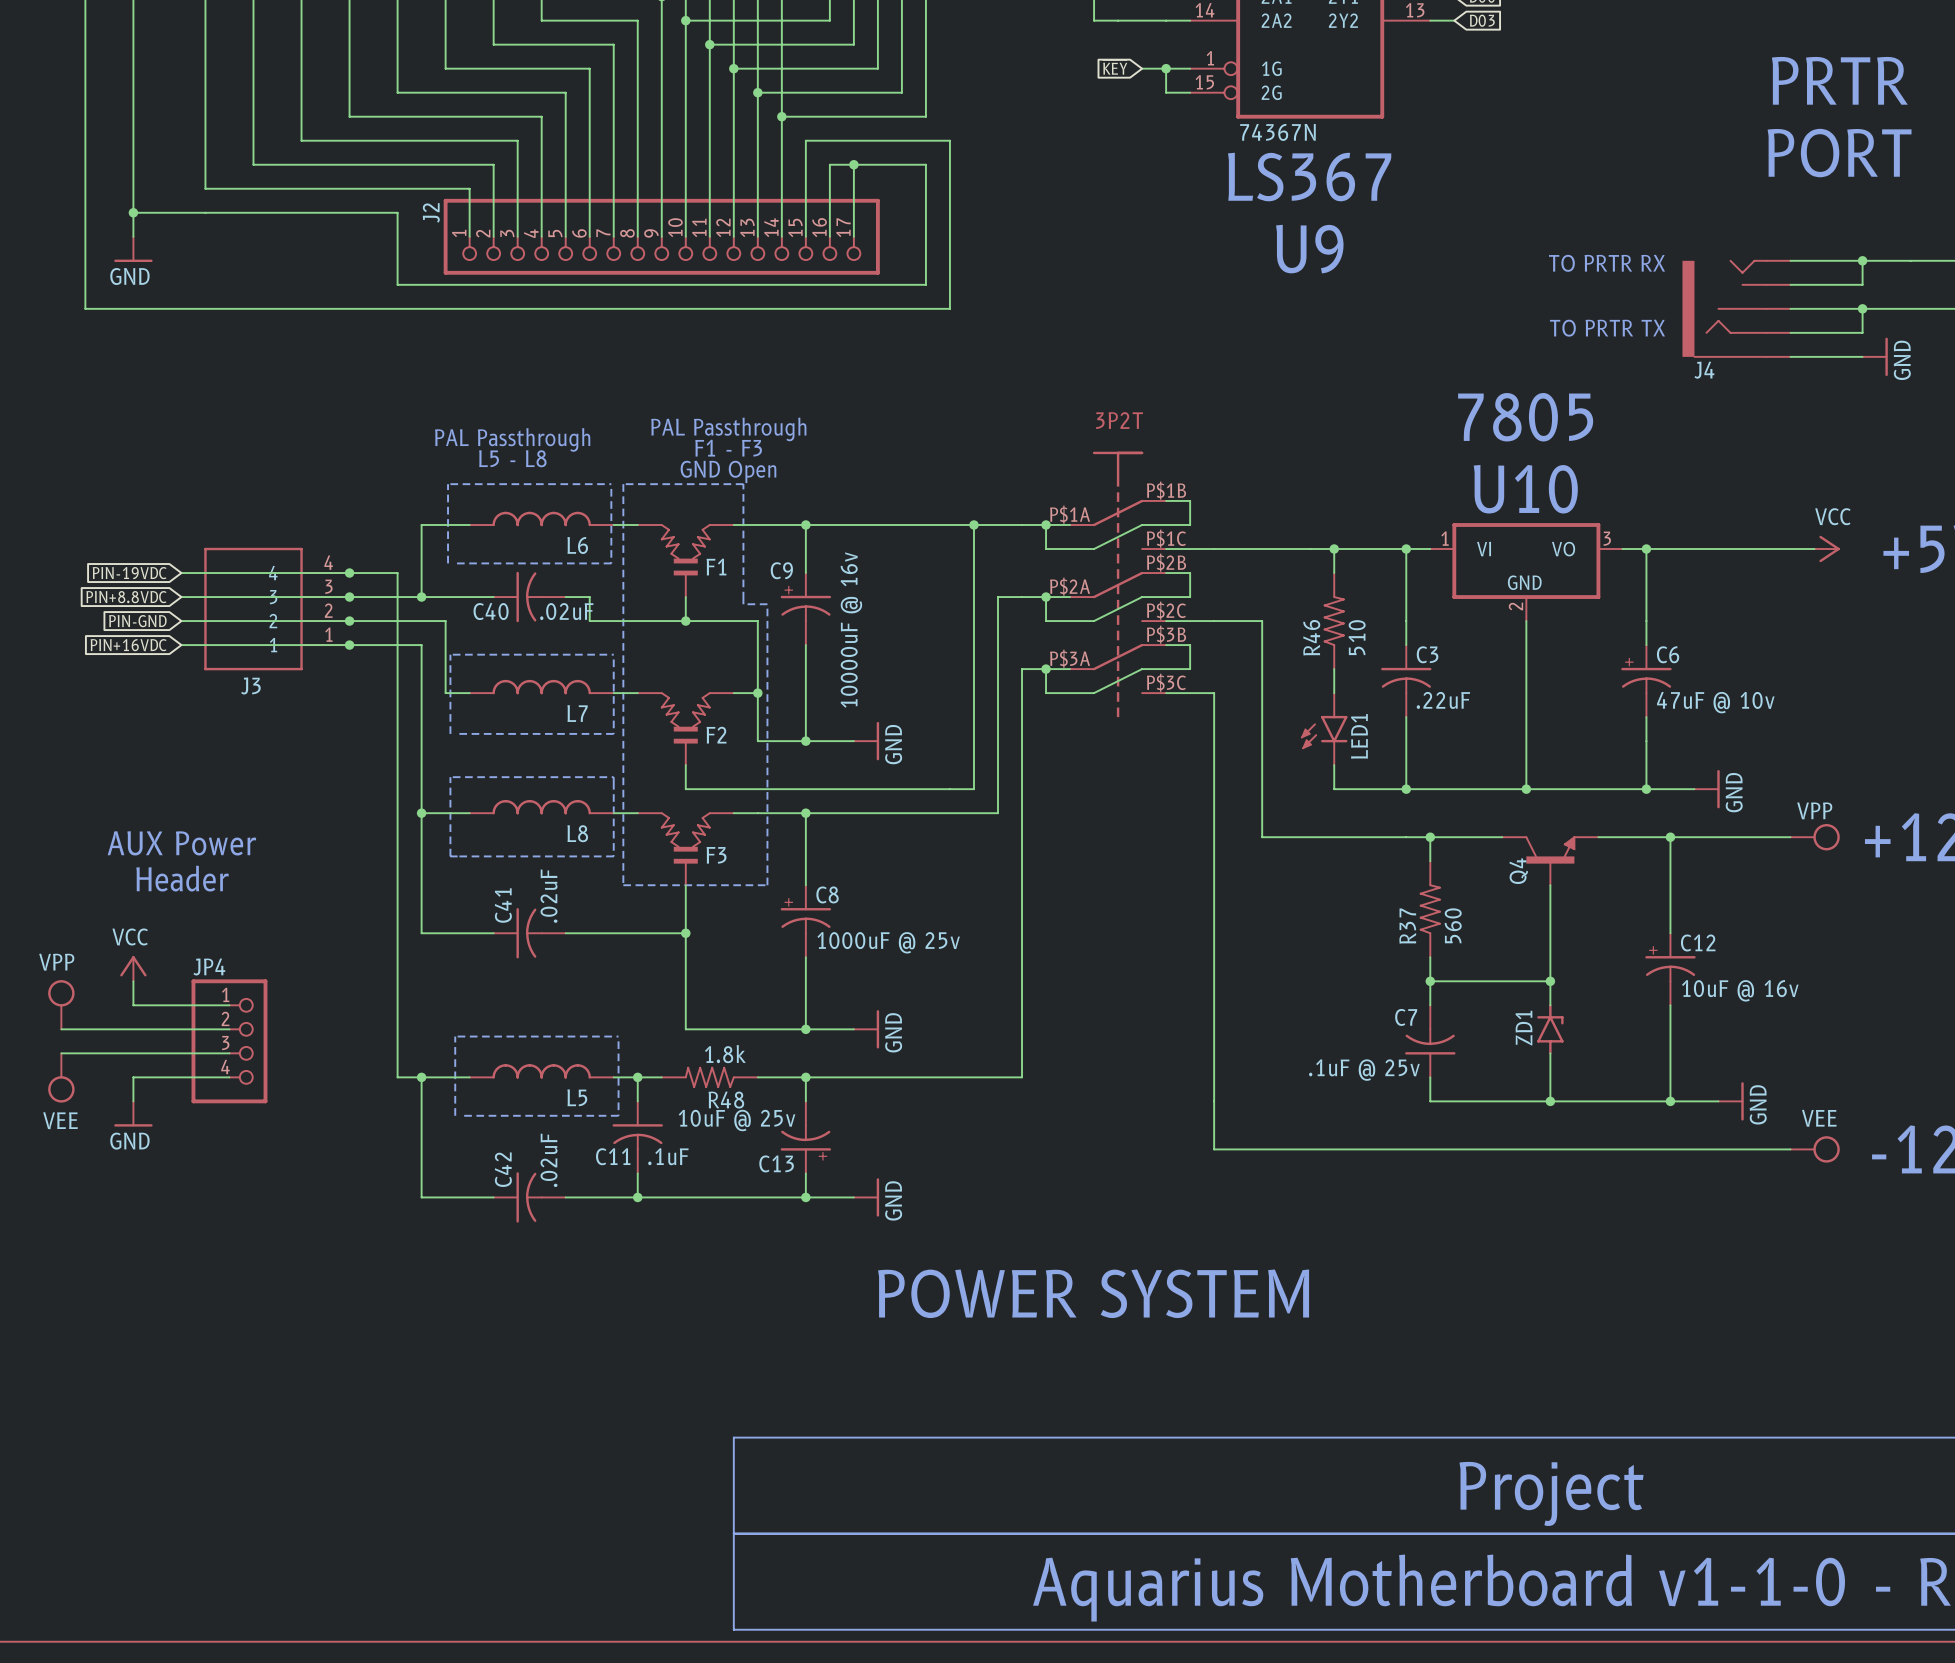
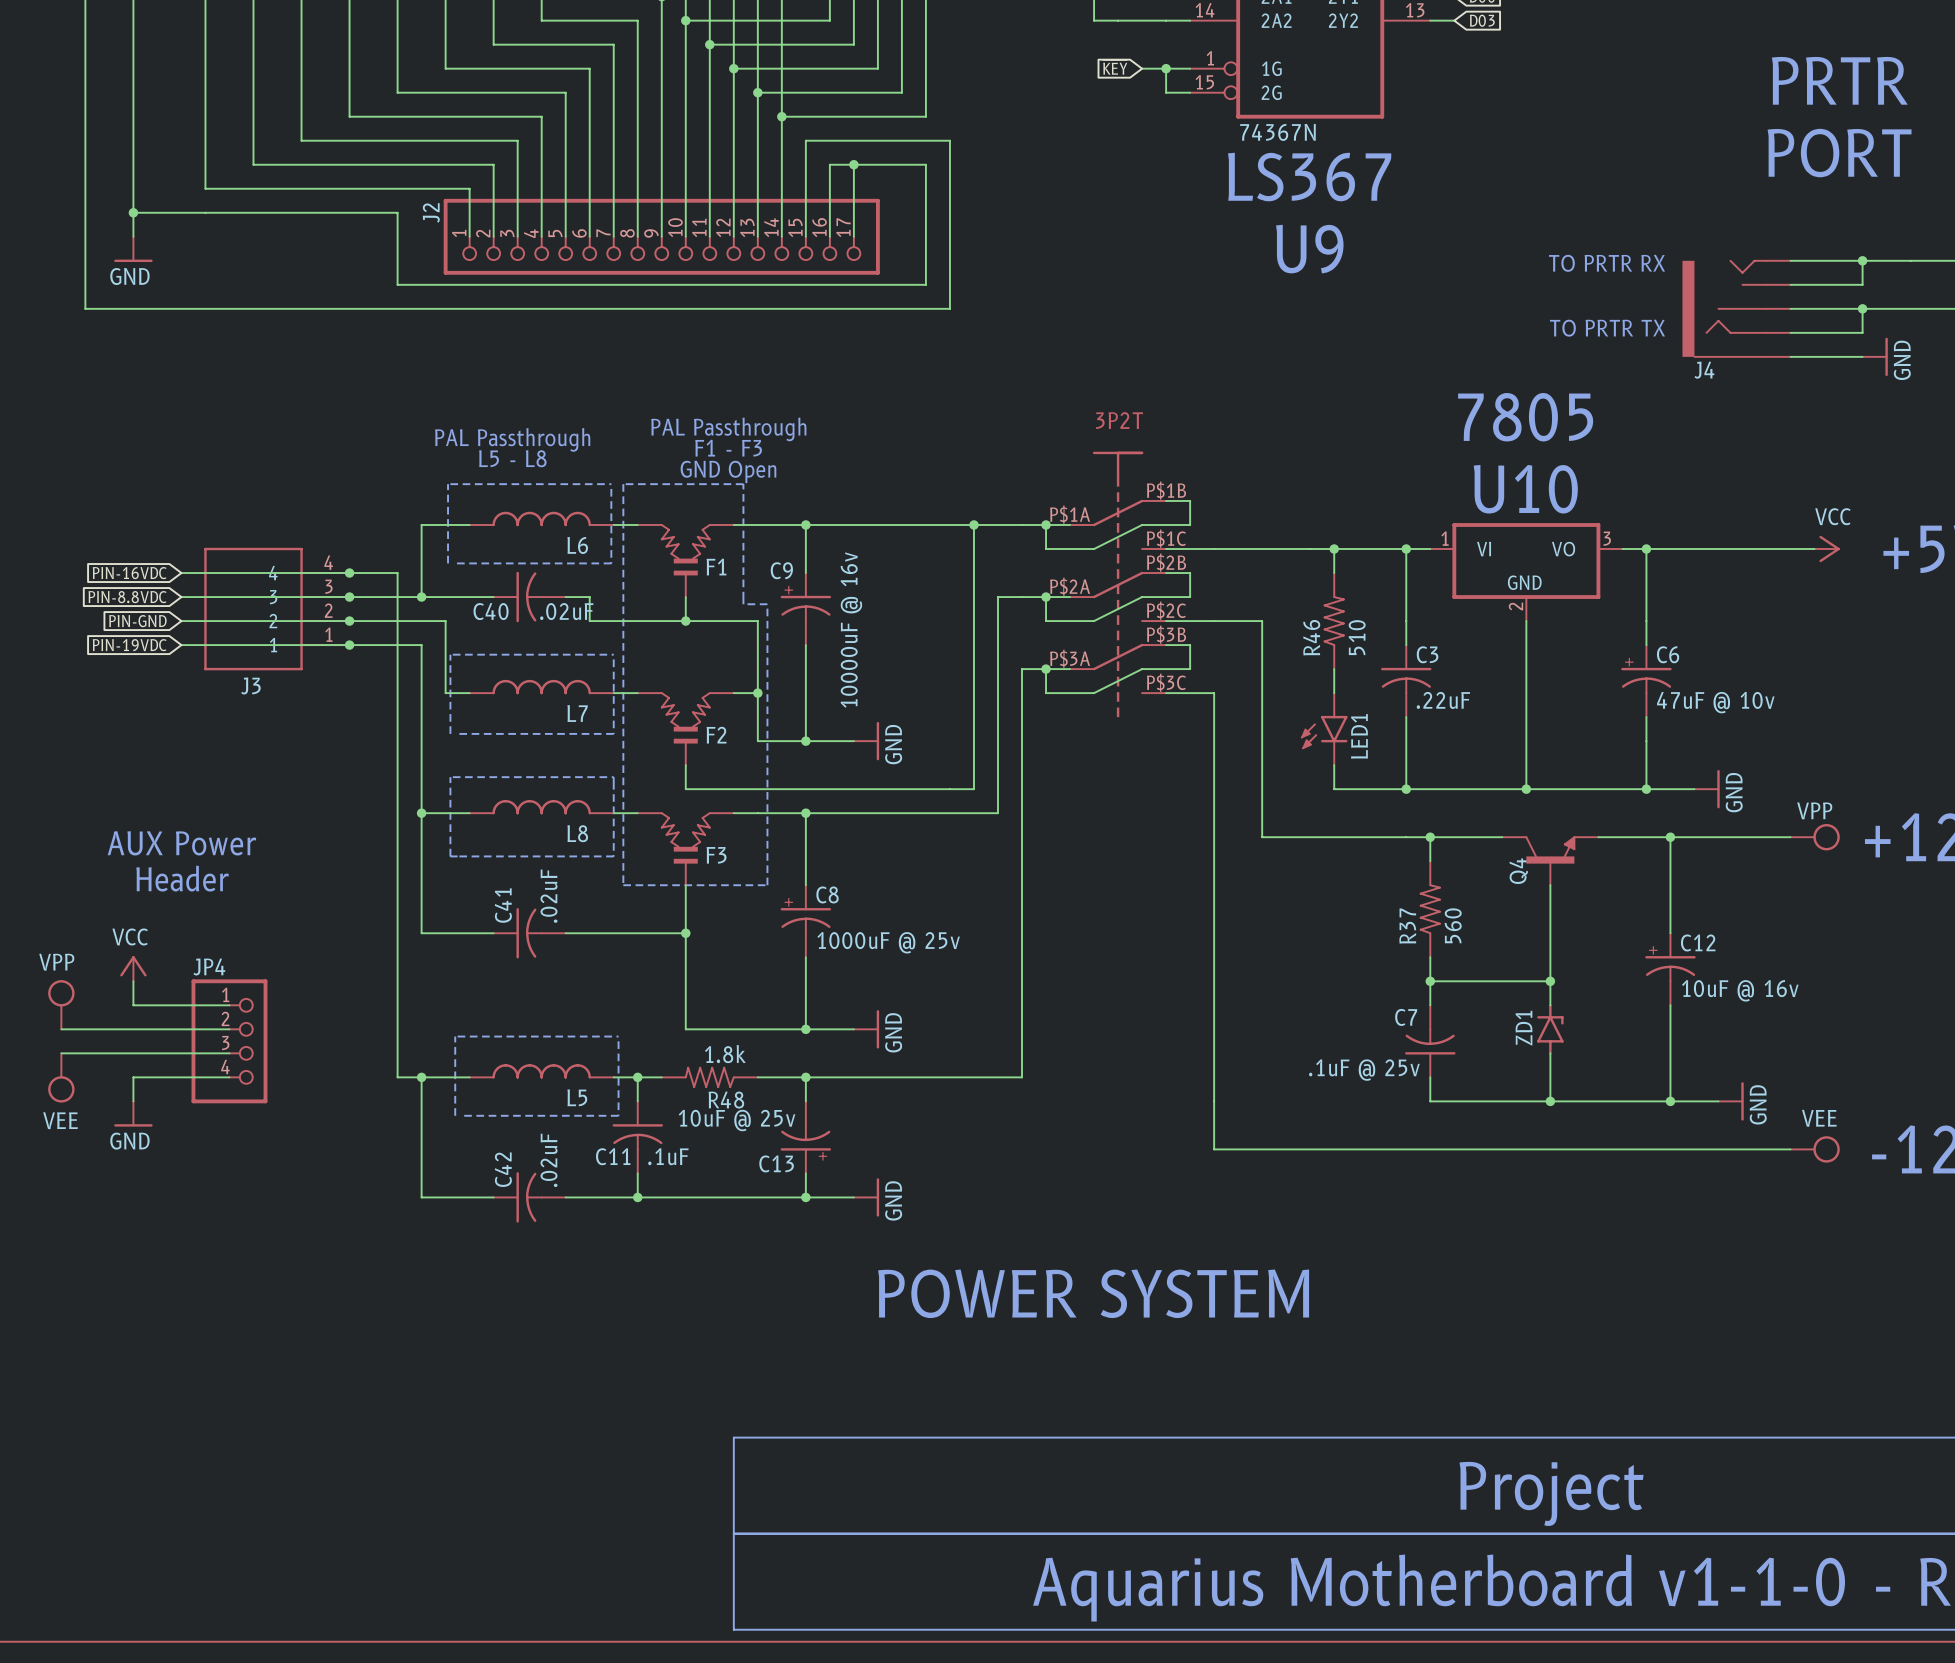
global label: PIN-19VDC (129, 573) -> PIN-16VDC (129, 573)
global label: PIN+8.8VDC (126, 597) -> PIN-8.8VDC (127, 597)
global label: PIN+16VDC (128, 645) -> PIN-19VDC (129, 645)

